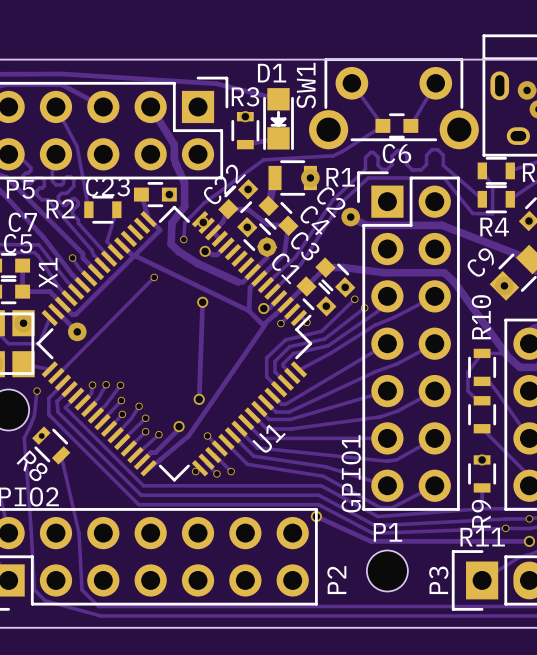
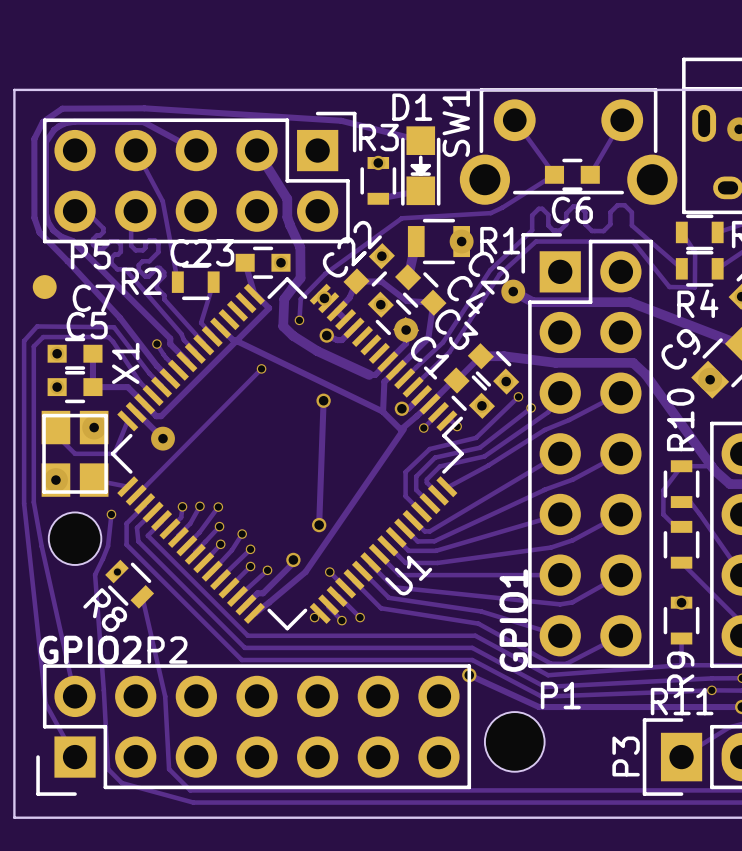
part: none -> (514, 741)
part: (387, 570) -> none
P2 name rotation: 0° (336, 580) -> 90° clockwise (167, 650)
P2 name position: P2 (336, 580) -> P2 (167, 650)

